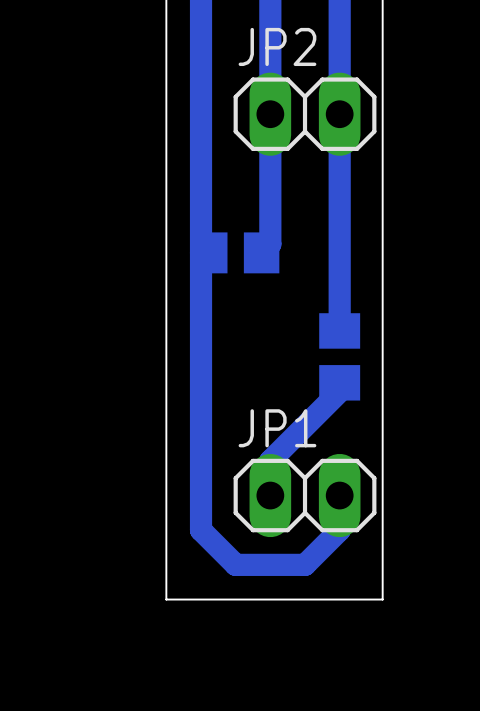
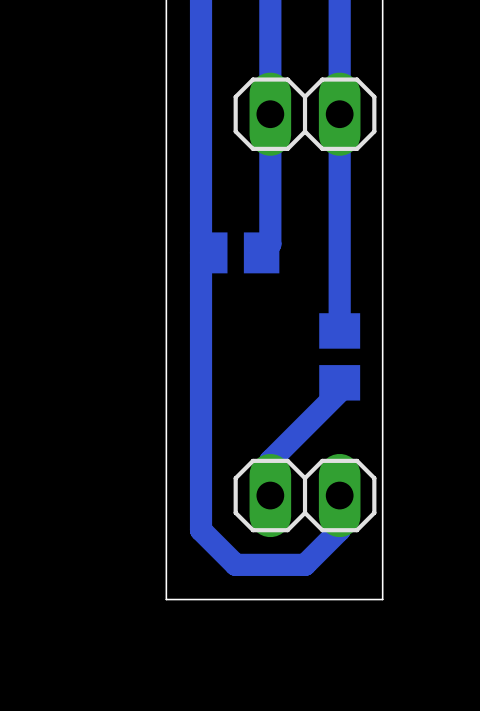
JP2 name: JP2 (277, 46) -> none
JP1 name: JP1 (277, 428) -> none

